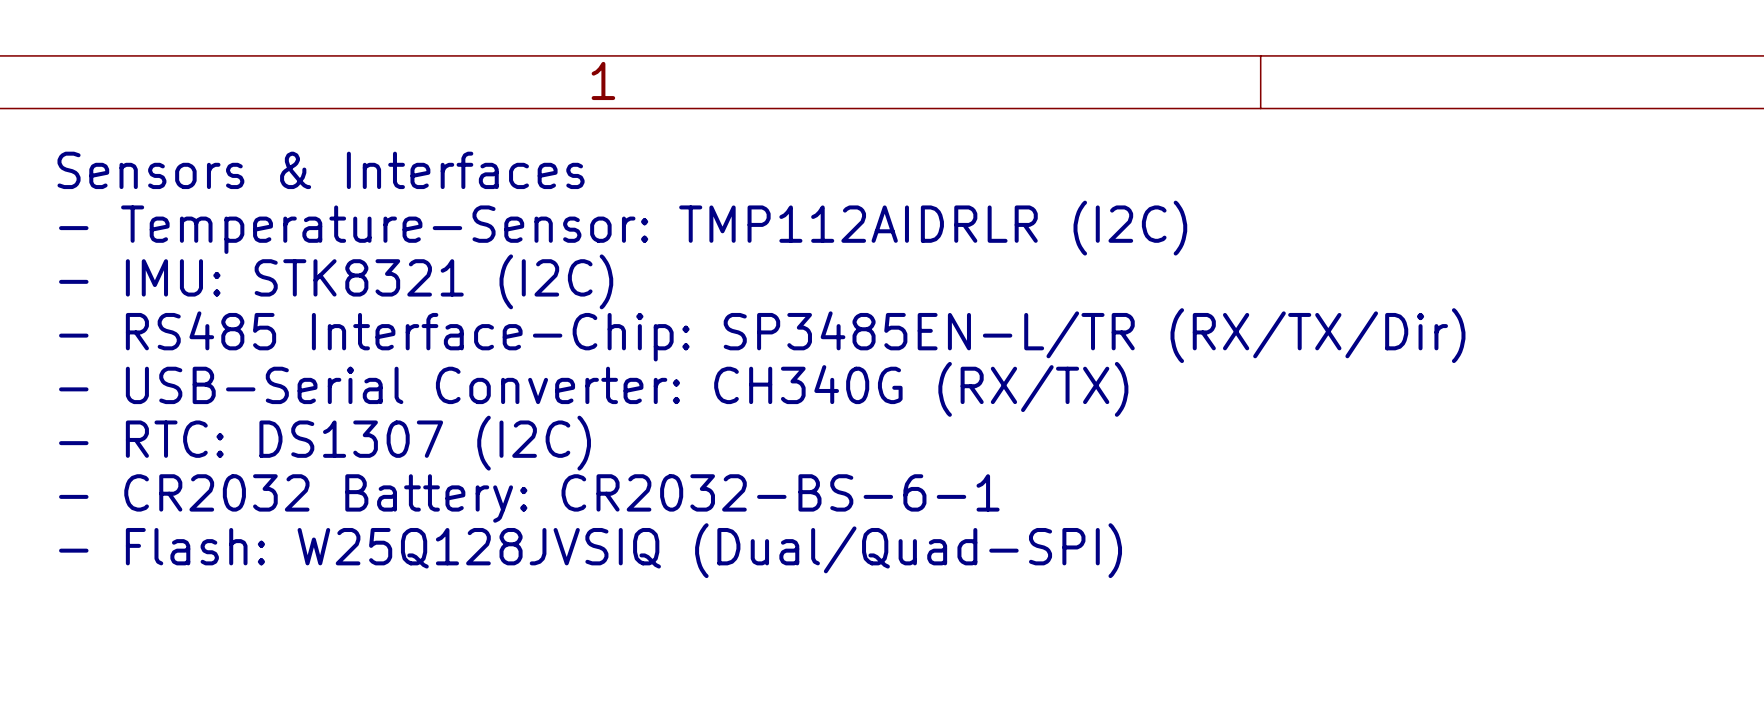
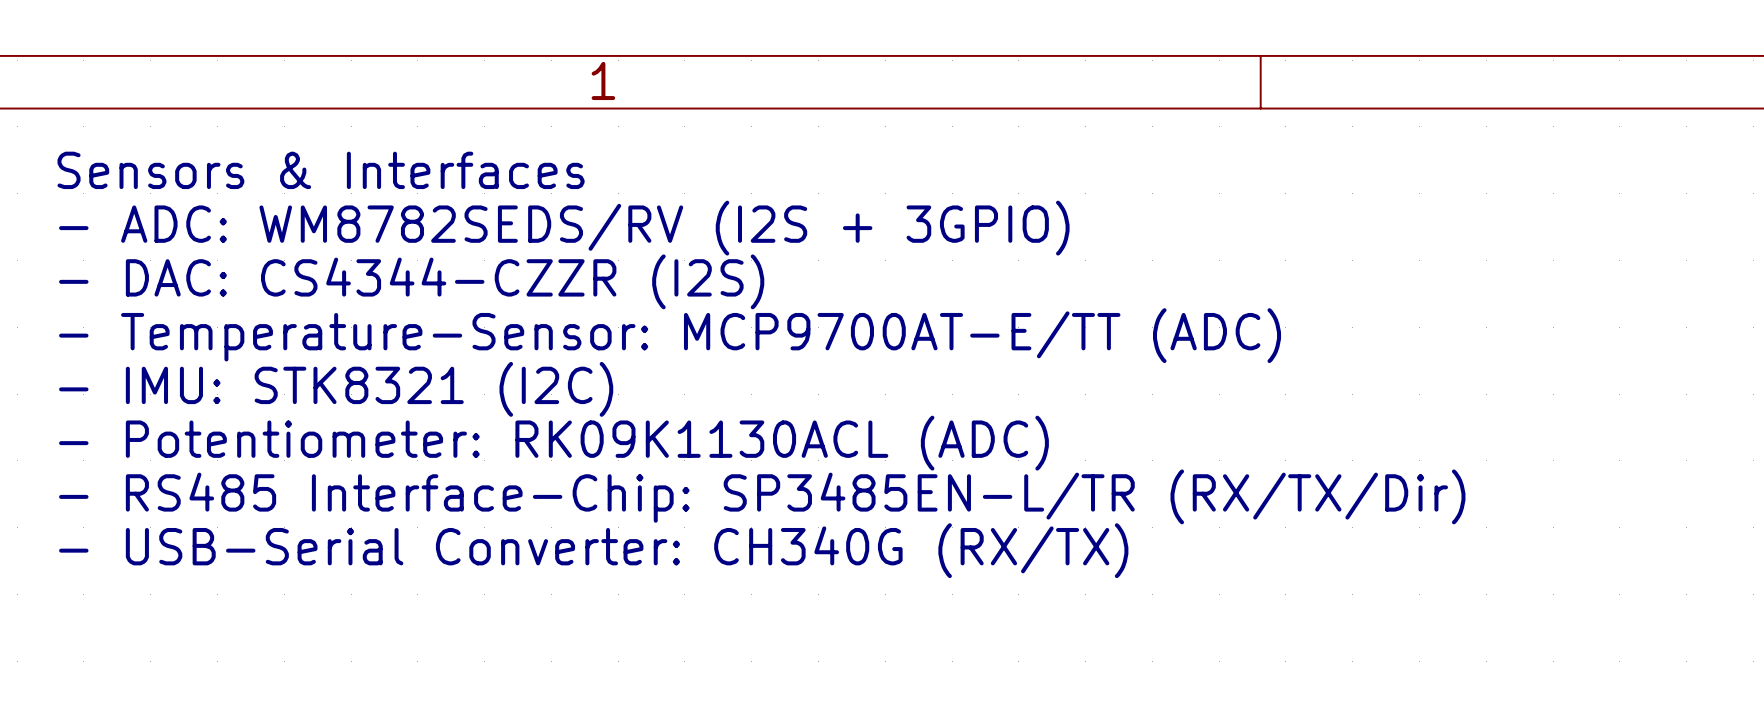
text: - Temperature-Sensor: TMP112AIDRLR (I2C) (623, 228) -> - ADC: WM8782SEDS/RV (I2S + 3GPIO) (564, 228)
text: - IMU: STK8321 (I2C) (336, 281) -> - DAC: CS4344-CZZR (I2S) (411, 281)
text: - RS485 Interface-Chip: SP3485EN-L/TR (RX/TX/Dir) (762, 335) -> - Temperature-Sensor: MCP9700AT-E/TT (ADC) (670, 335)
text: - USB-Serial Converter: CH340G (RX/TX) (593, 389) -> - IMU: STK8321 (I2C) (336, 389)
text: - RTC: DS1307 (I2C) (325, 443) -> - Potentiometer: RK09K1130ACL (ADC) (553, 443)
text: - CR2032 Battery: CR2032-BS-6-1 (529, 498) -> - RS485 Interface-Chip: SP3485EN-L/TR (RX/TX/Dir) (762, 496)
text: - Flash: W25Q128JVSIQ (Dual/Quad-SPI) (590, 550) -> - USB-Serial Converter: CH340G (RX/TX) (593, 550)

